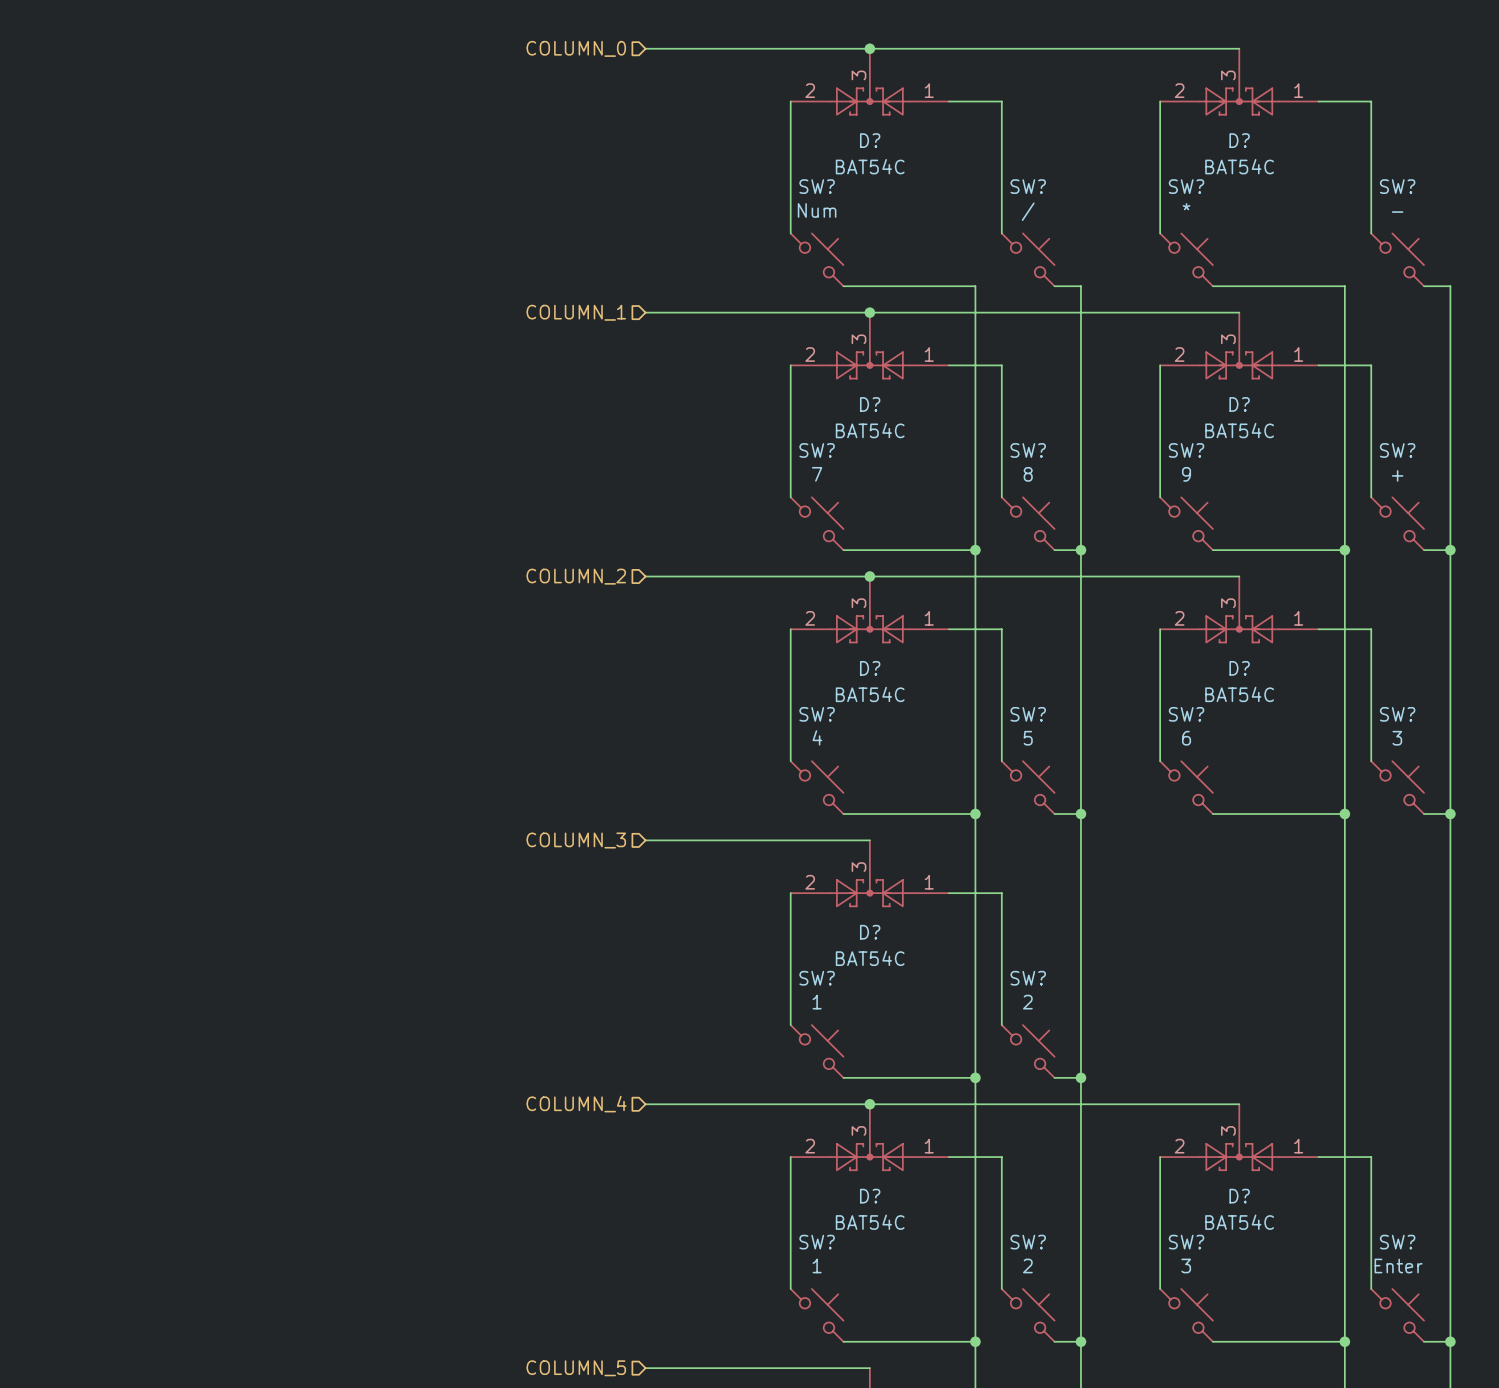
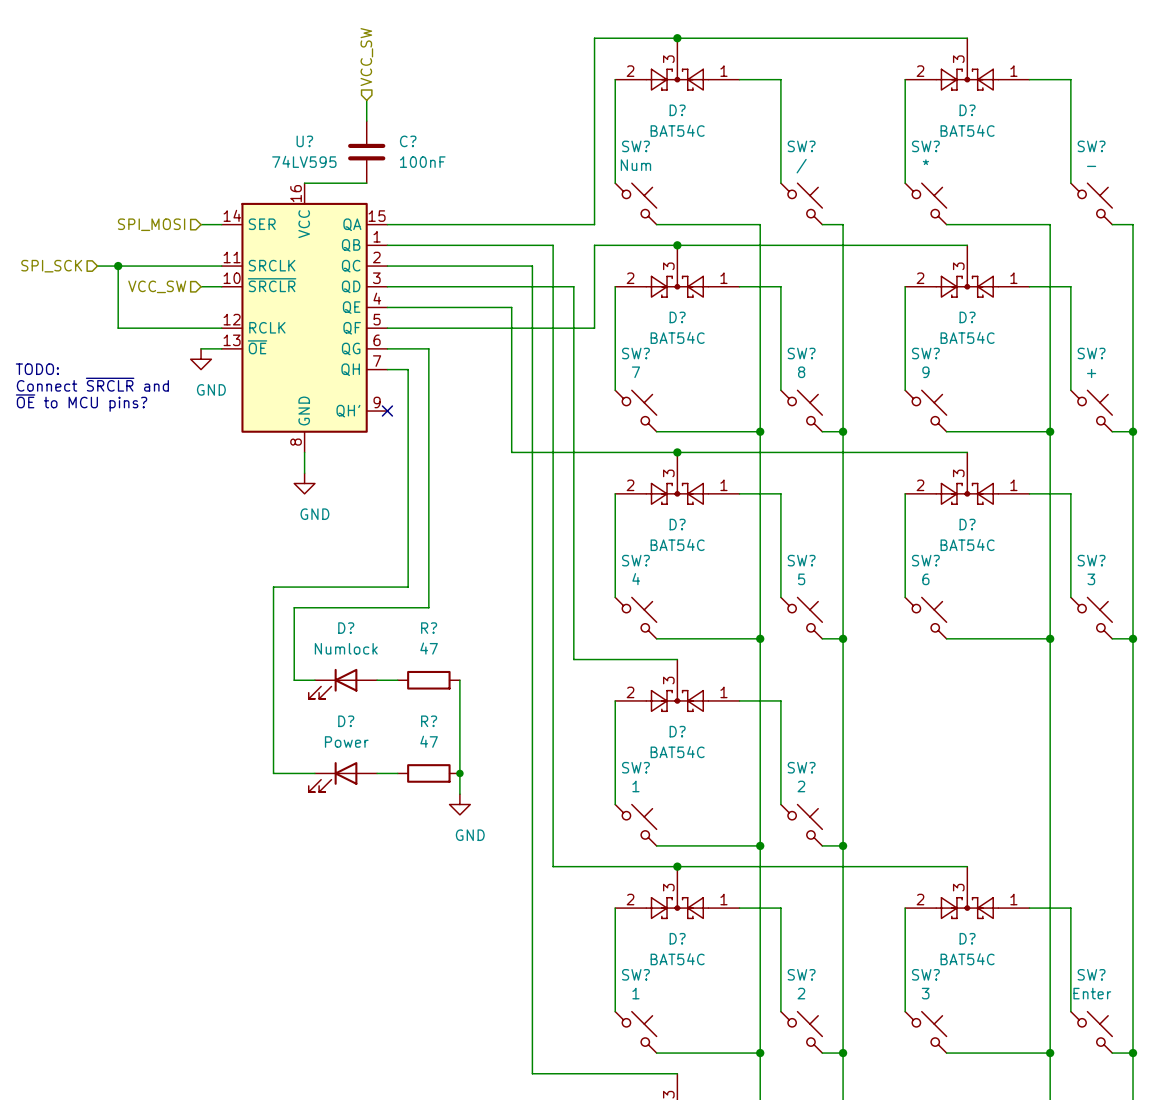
hierarchical label: COLUMN_0 (576, 48) -> none
wire: (645, 48) (764, 48) -> (387, 224) (594, 224) (594, 38)
hierarchical label: none -> VCC_SW (366, 57)
wire: none -> (366, 100) (366, 121)
C?: none -> 100nF (366, 152)
wire: none -> (304, 183) (366, 183)
hierarchical label: none -> SPI_MOSI (151, 224)
wire: none -> (201, 224) (221, 224)
wire: none -> (387, 245) (501, 245)
hierarchical label: COLUMN_1 (576, 312) -> none
wire: (711, 312) (764, 312) -> (387, 328) (594, 328) (594, 245)
hierarchical label: none -> SPI_SCK (51, 266)
wire: none -> (97, 266) (221, 266)
wire: none -> (118, 266) (118, 328) (221, 328)
junction: none -> (118, 266)
hierarchical label: none -> VCC_SW (157, 286)
wire: none -> (201, 286) (221, 286)
U?: none -> 74LV595 (304, 317)
wire: none -> (201, 348) (221, 348)
wire: none -> (387, 348) (428, 348) (428, 607) (294, 607) (294, 680) (314, 680)
power symbol: none -> GND (201, 359)
text: none -> TODO: (37, 369)
wire: none -> (387, 369) (408, 369) (408, 587) (273, 587) (273, 773) (314, 773)
text: none -> Connect ~{SRCLR} and (92, 384)
text: none -> ~{OE} to MCU pins? (81, 403)
no-connect mark: none -> (387, 411)
wire: none -> (304, 452) (304, 473)
hierarchical label: COLUMN_2 (576, 576) -> none
wire: (645, 576) (658, 576) -> (387, 307) (511, 307) (511, 452)
power symbol: none -> GND (304, 483)
hierarchical label: COLUMN_3 (576, 840) -> none
wire: (645, 840) (737, 840) -> (387, 286) (573, 286) (573, 659)
wire: none -> (377, 680) (397, 680)
R?: none -> 47 (428, 680)
wire: none -> (459, 680) (459, 794)
D?: none -> Numlock (342, 683)
wire: none -> (377, 773) (397, 773)
R?: none -> 47 (428, 773)
junction: none -> (459, 773)
D?: none -> Power (342, 777)
power symbol: none -> GND (459, 804)
hierarchical label: COLUMN_4 (576, 1104) -> none
wire: (645, 1104) (711, 1104) -> (553, 245) (553, 866)
hierarchical label: COLUMN_5 (576, 1368) -> none
wire: (645, 1368) (685, 1368) -> (387, 266) (532, 266) (532, 1073)

